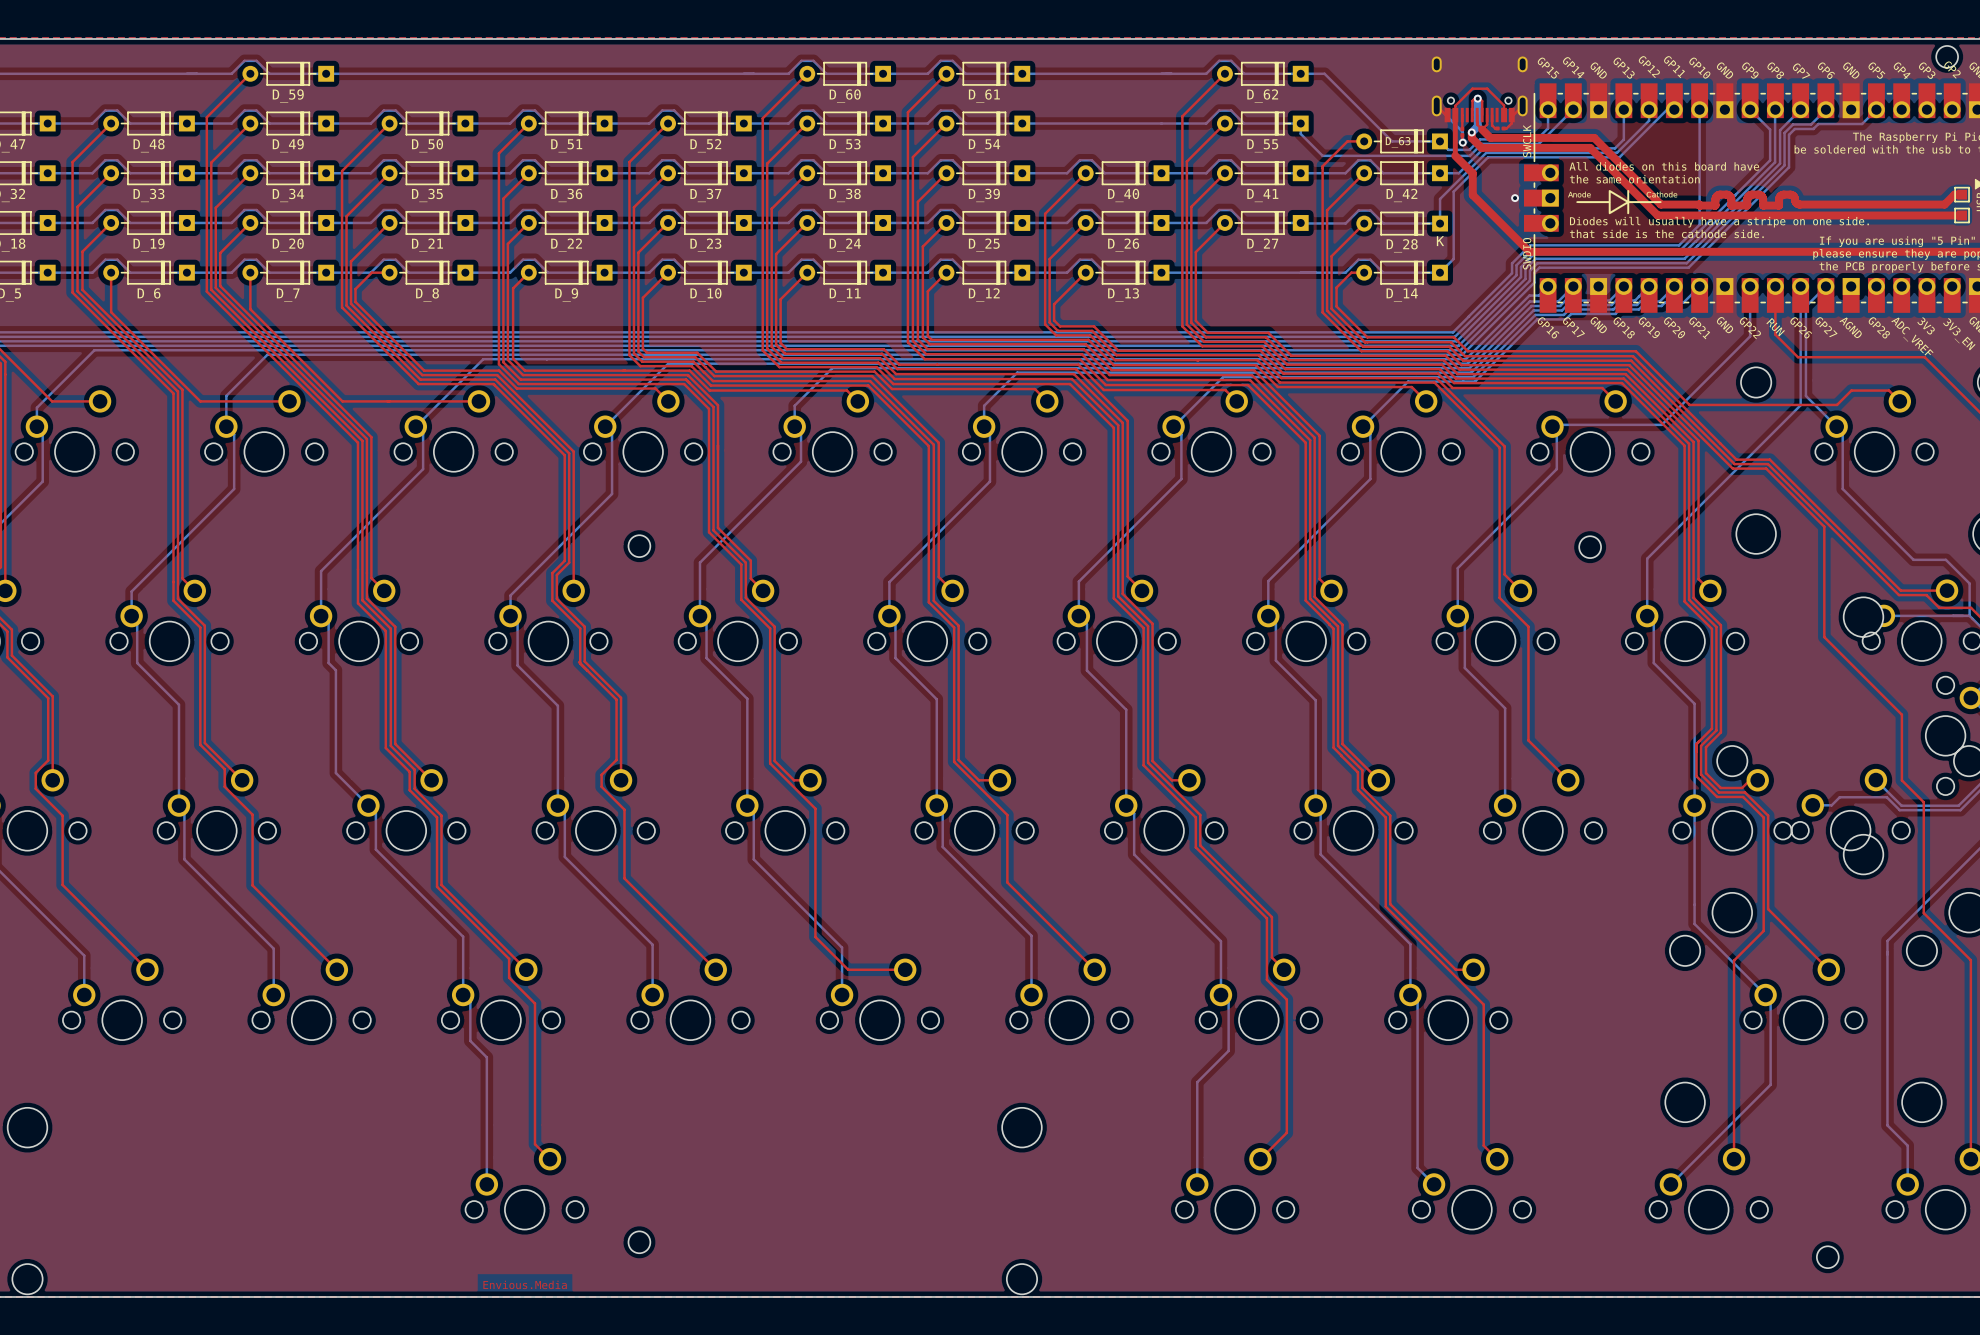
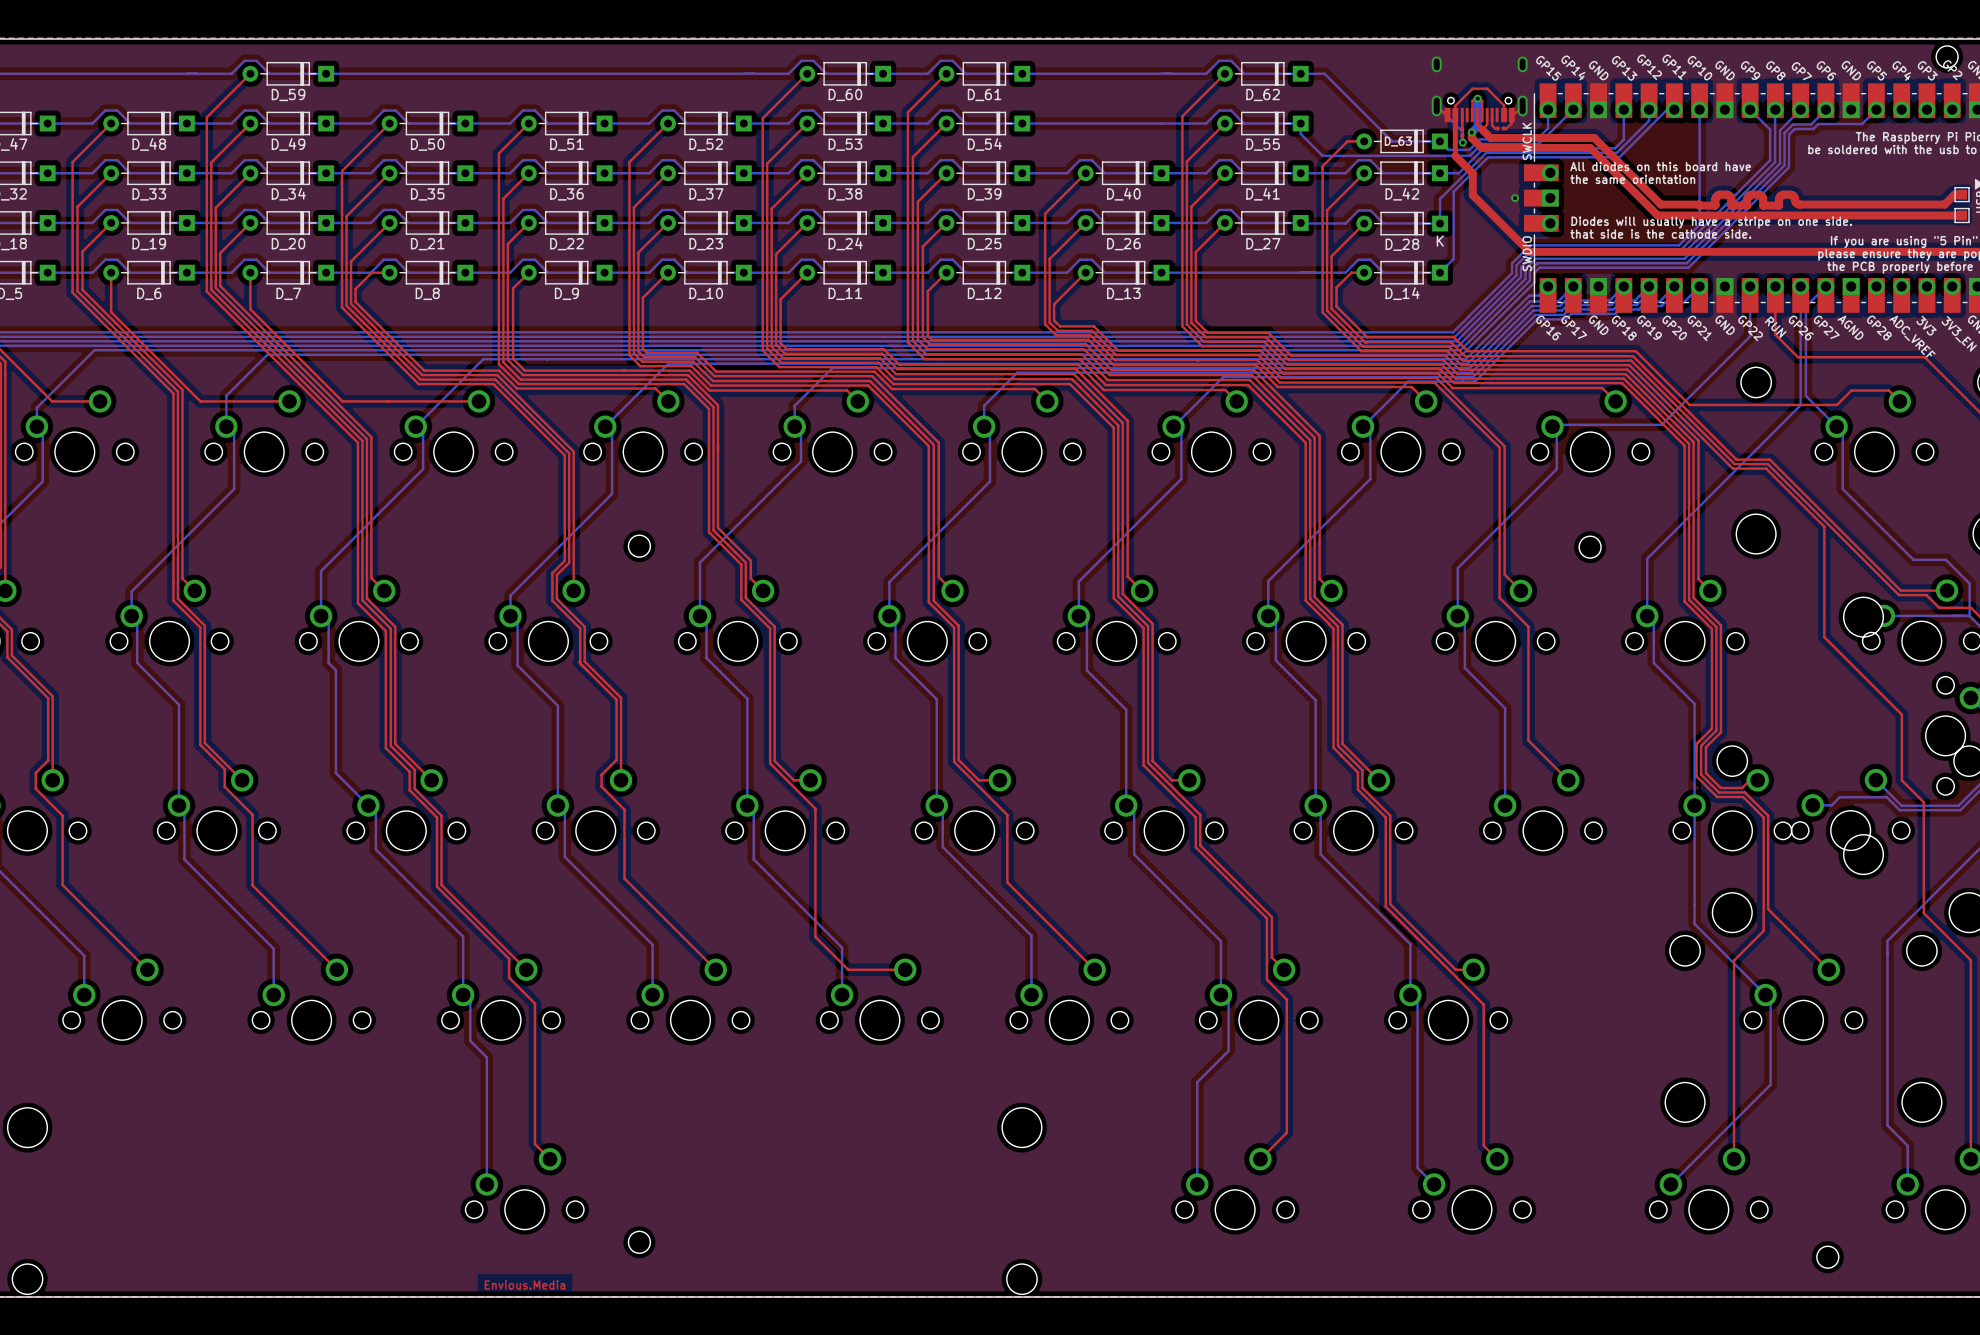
drawing: [1568, 190, 1678, 215] -> none

